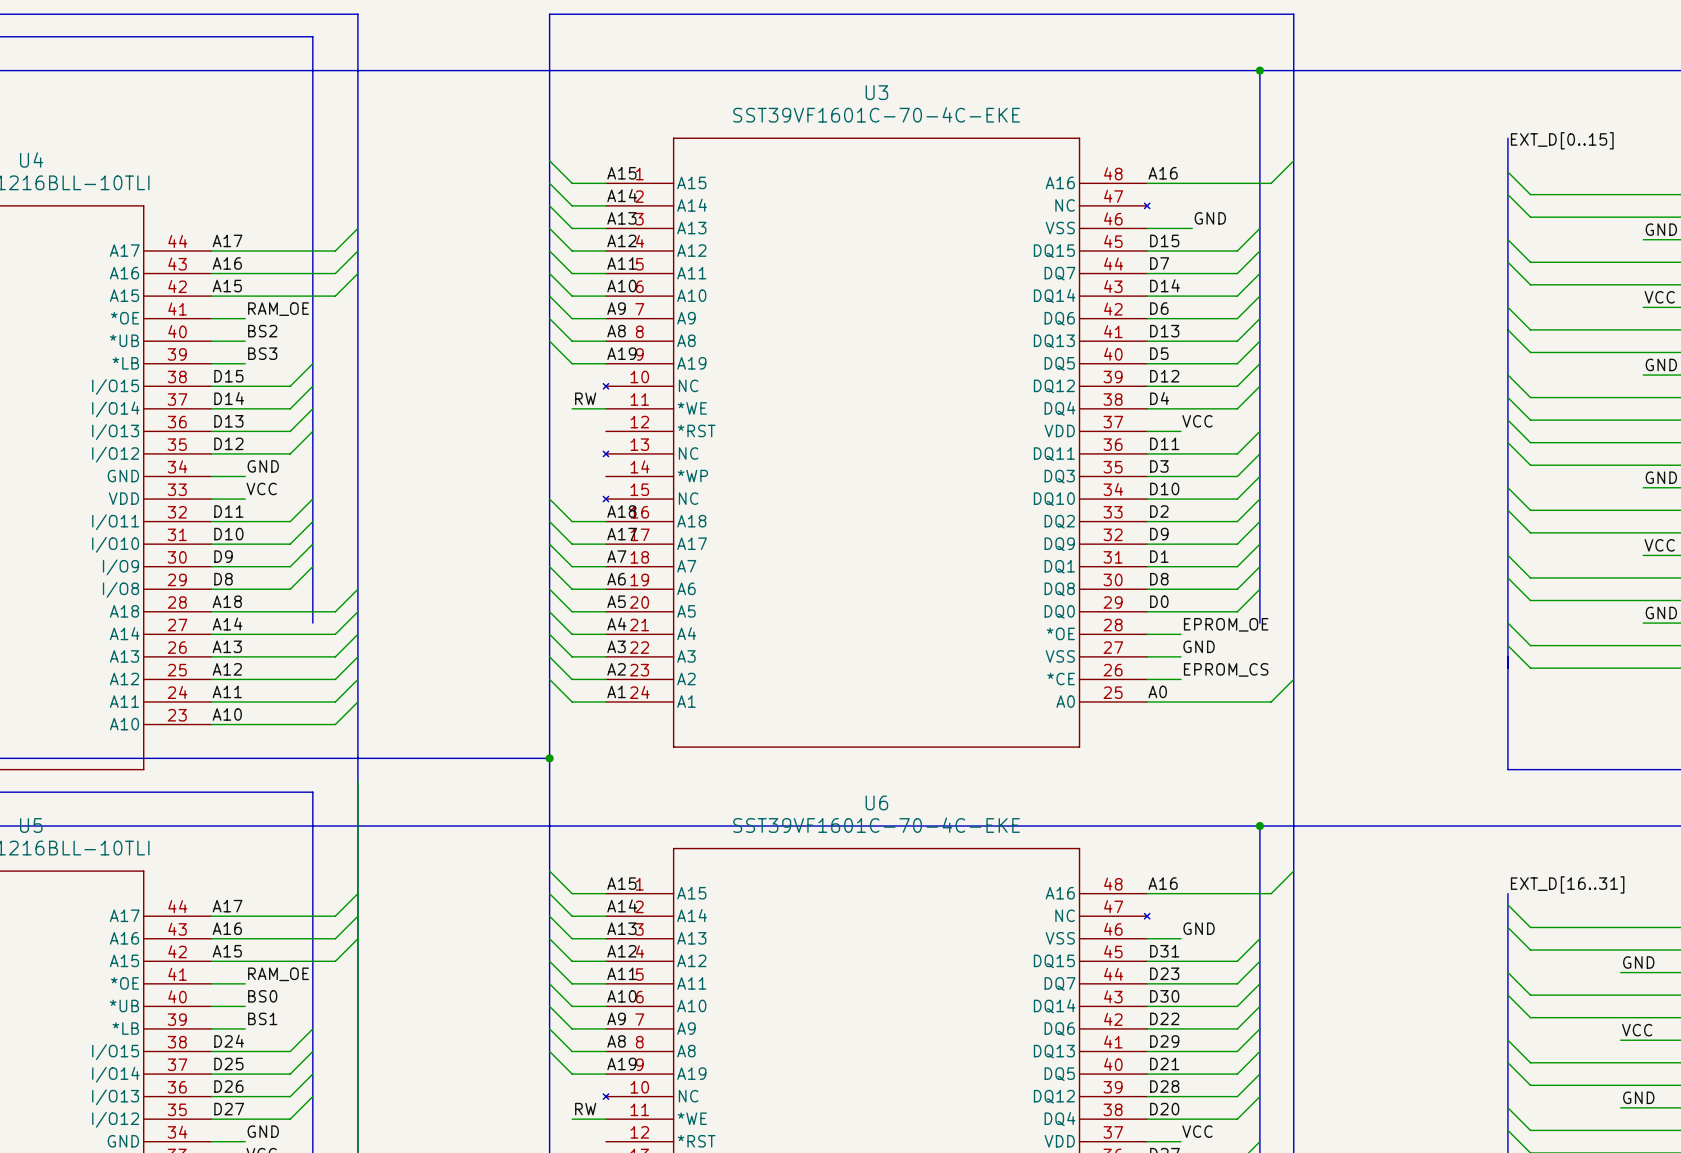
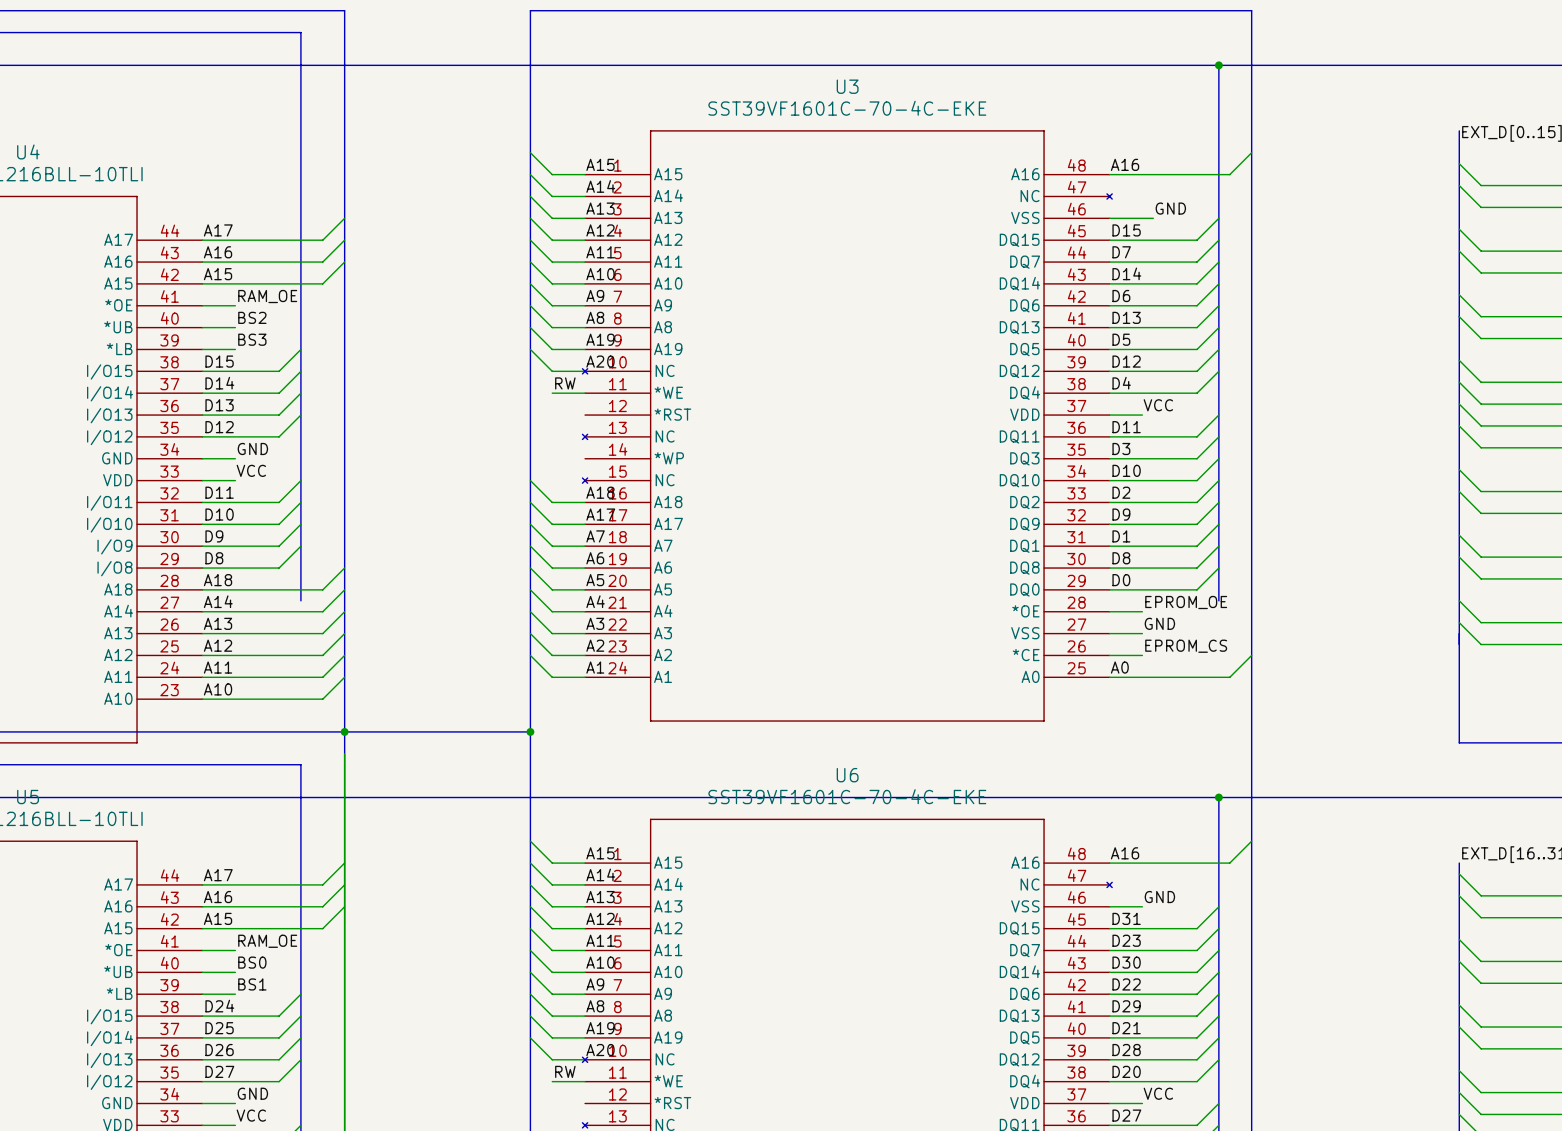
wire: none -> (530, 349) (552, 371) (585, 371)
label: none -> A20 (600, 361)
junction: none -> (344, 731)
wire: none -> (530, 1037) (552, 1059) (585, 1059)
label: none -> A20 (600, 1050)

